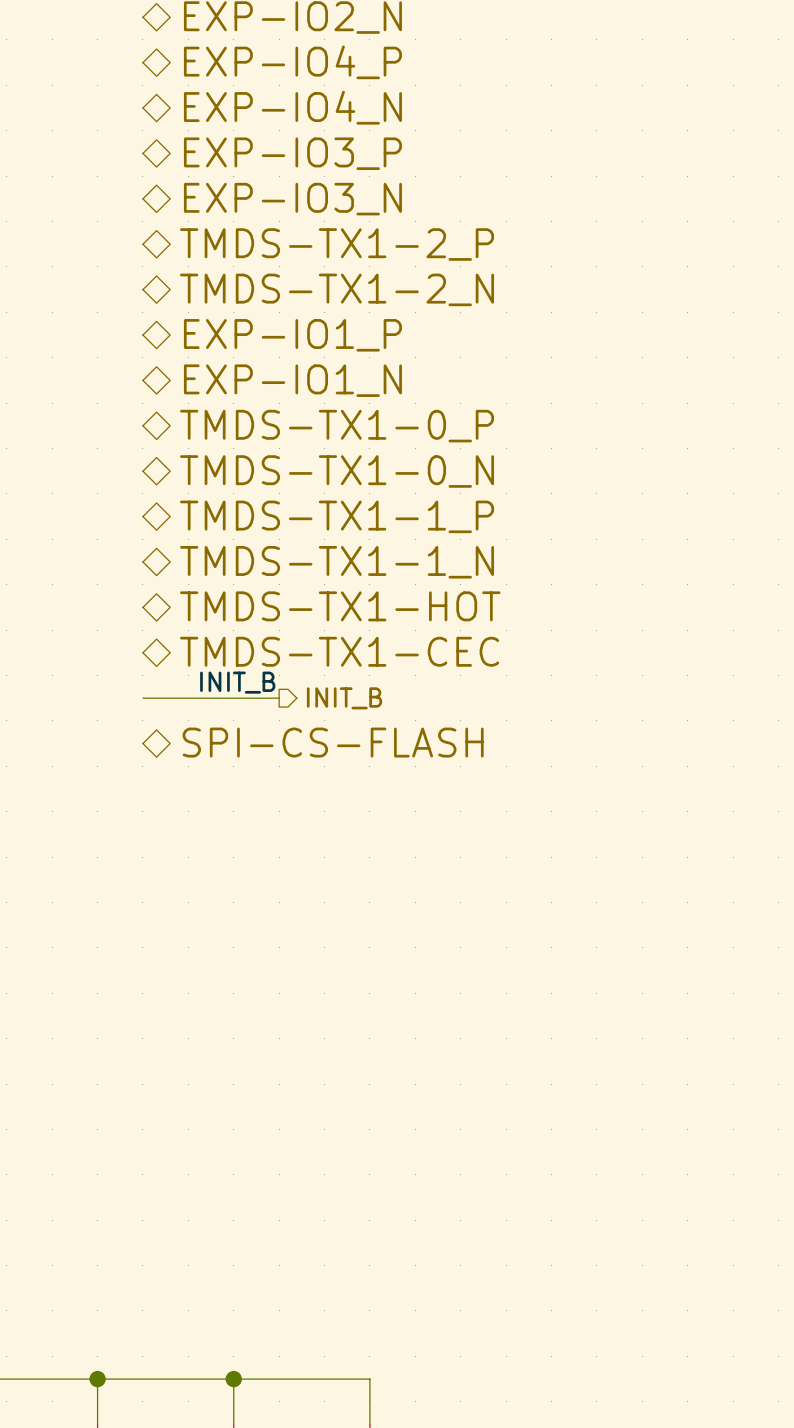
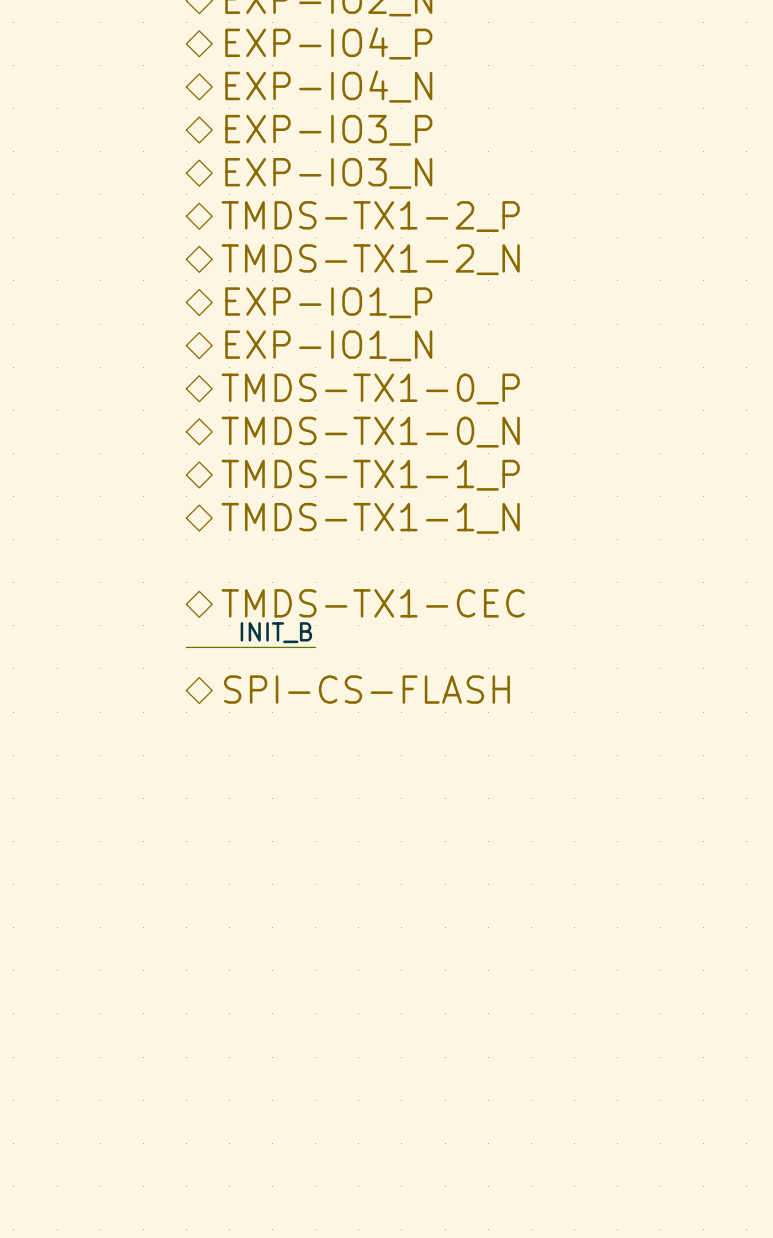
hierarchical label: TMDS-TX1-HOT (340, 606) -> none
hierarchical label: INIT_B (344, 698) -> none

